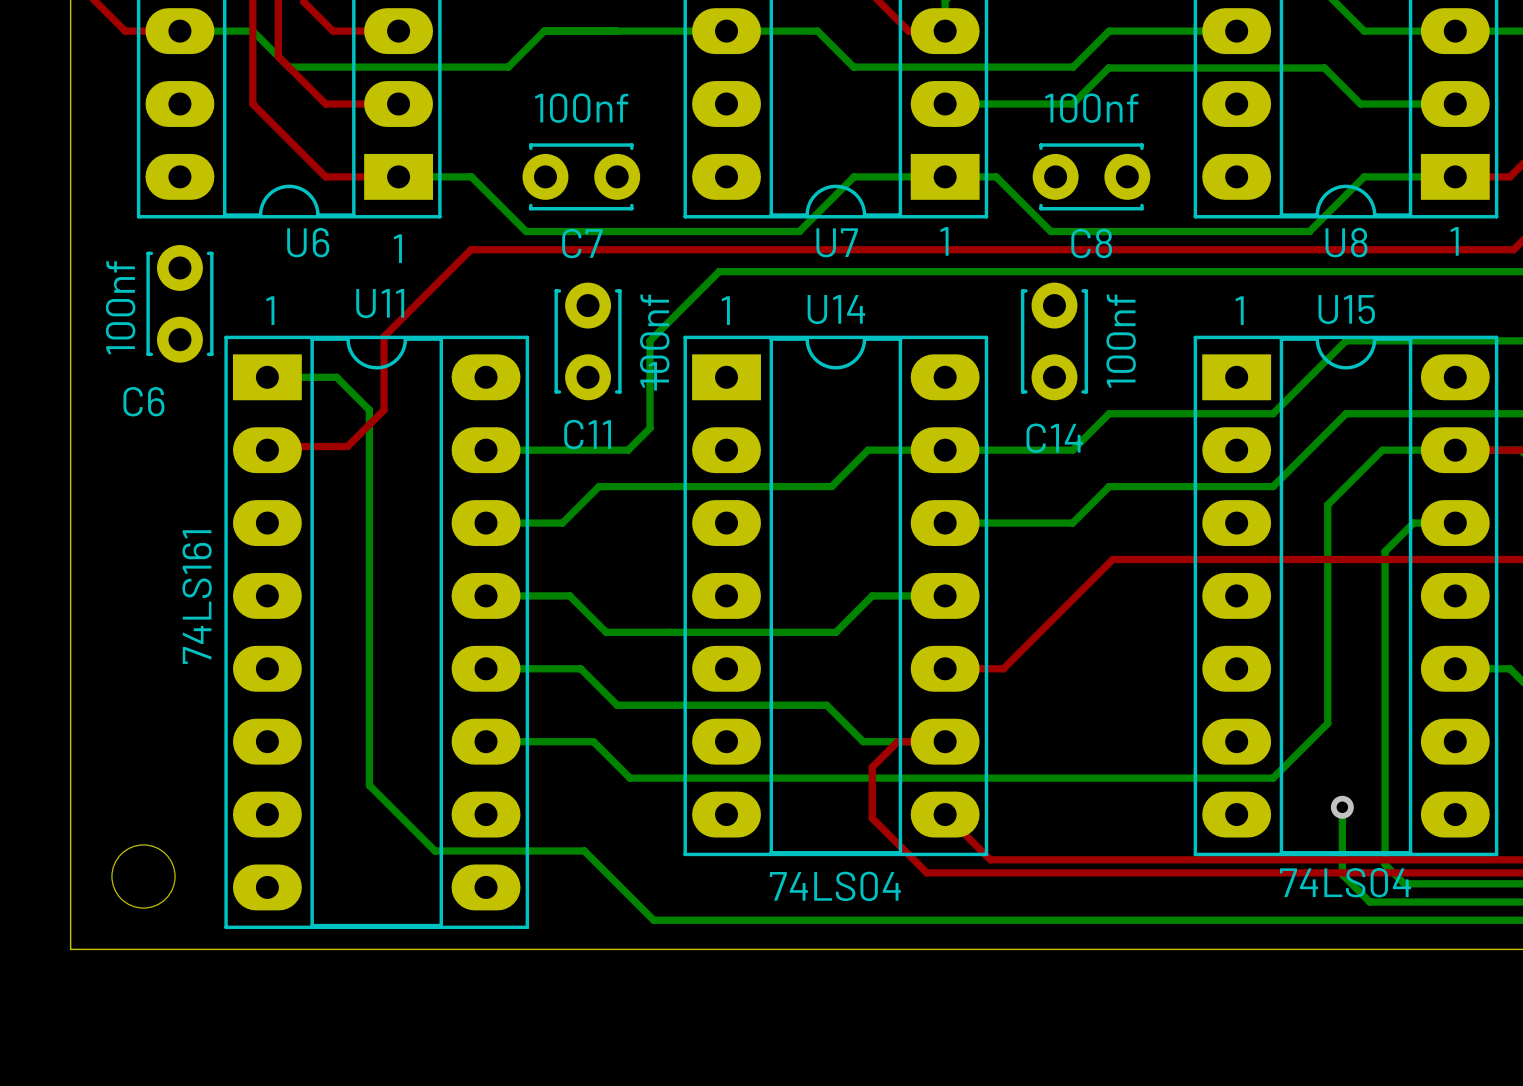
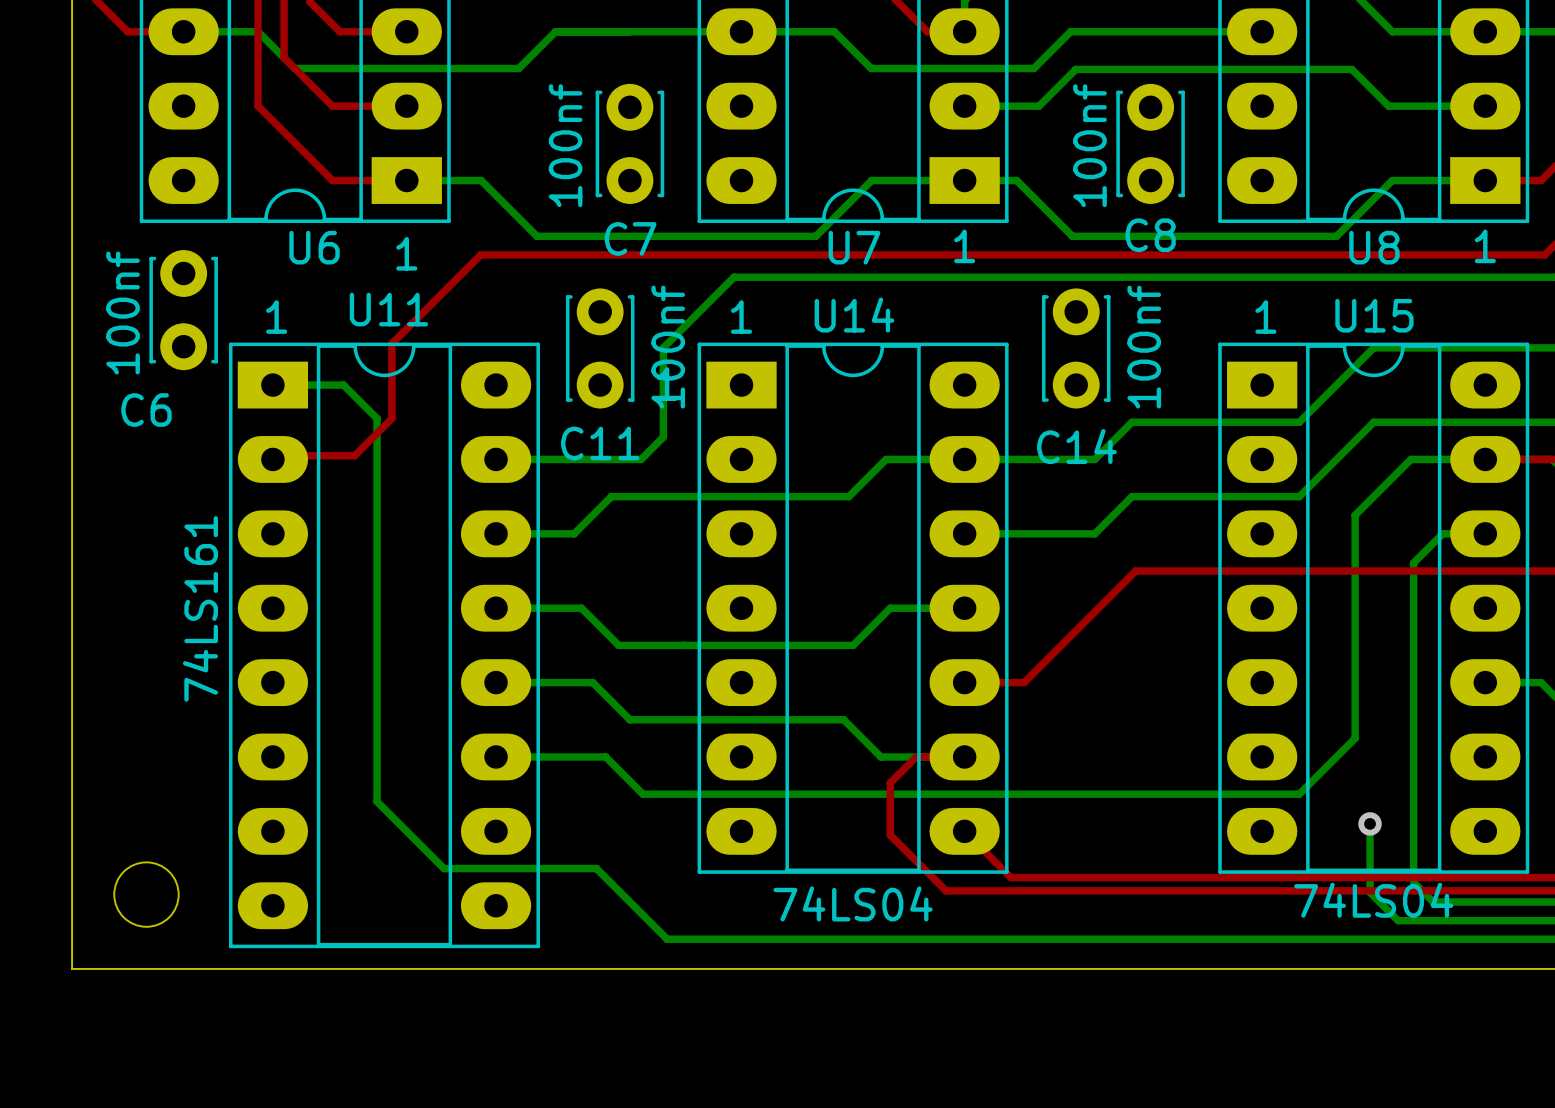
bottom track: (1109, 31) (1073, 67) (1013, 67) -> (1132, 31) (1070, 31) (1033, 68)
bottom track: (1108, 68) (1072, 104) (1018, 104) -> (1131, 69) (1075, 69) (1039, 106)
C7 value position: 100nf (581, 108) -> 100nf (565, 145)
C8 value position: 100nf (1091, 108) -> 100nf (1090, 145)
C7 rotation: 0° (581, 176) -> 90° clockwise (629, 143)
C8 rotation: 0° (1091, 176) -> 90° clockwise (1150, 143)

